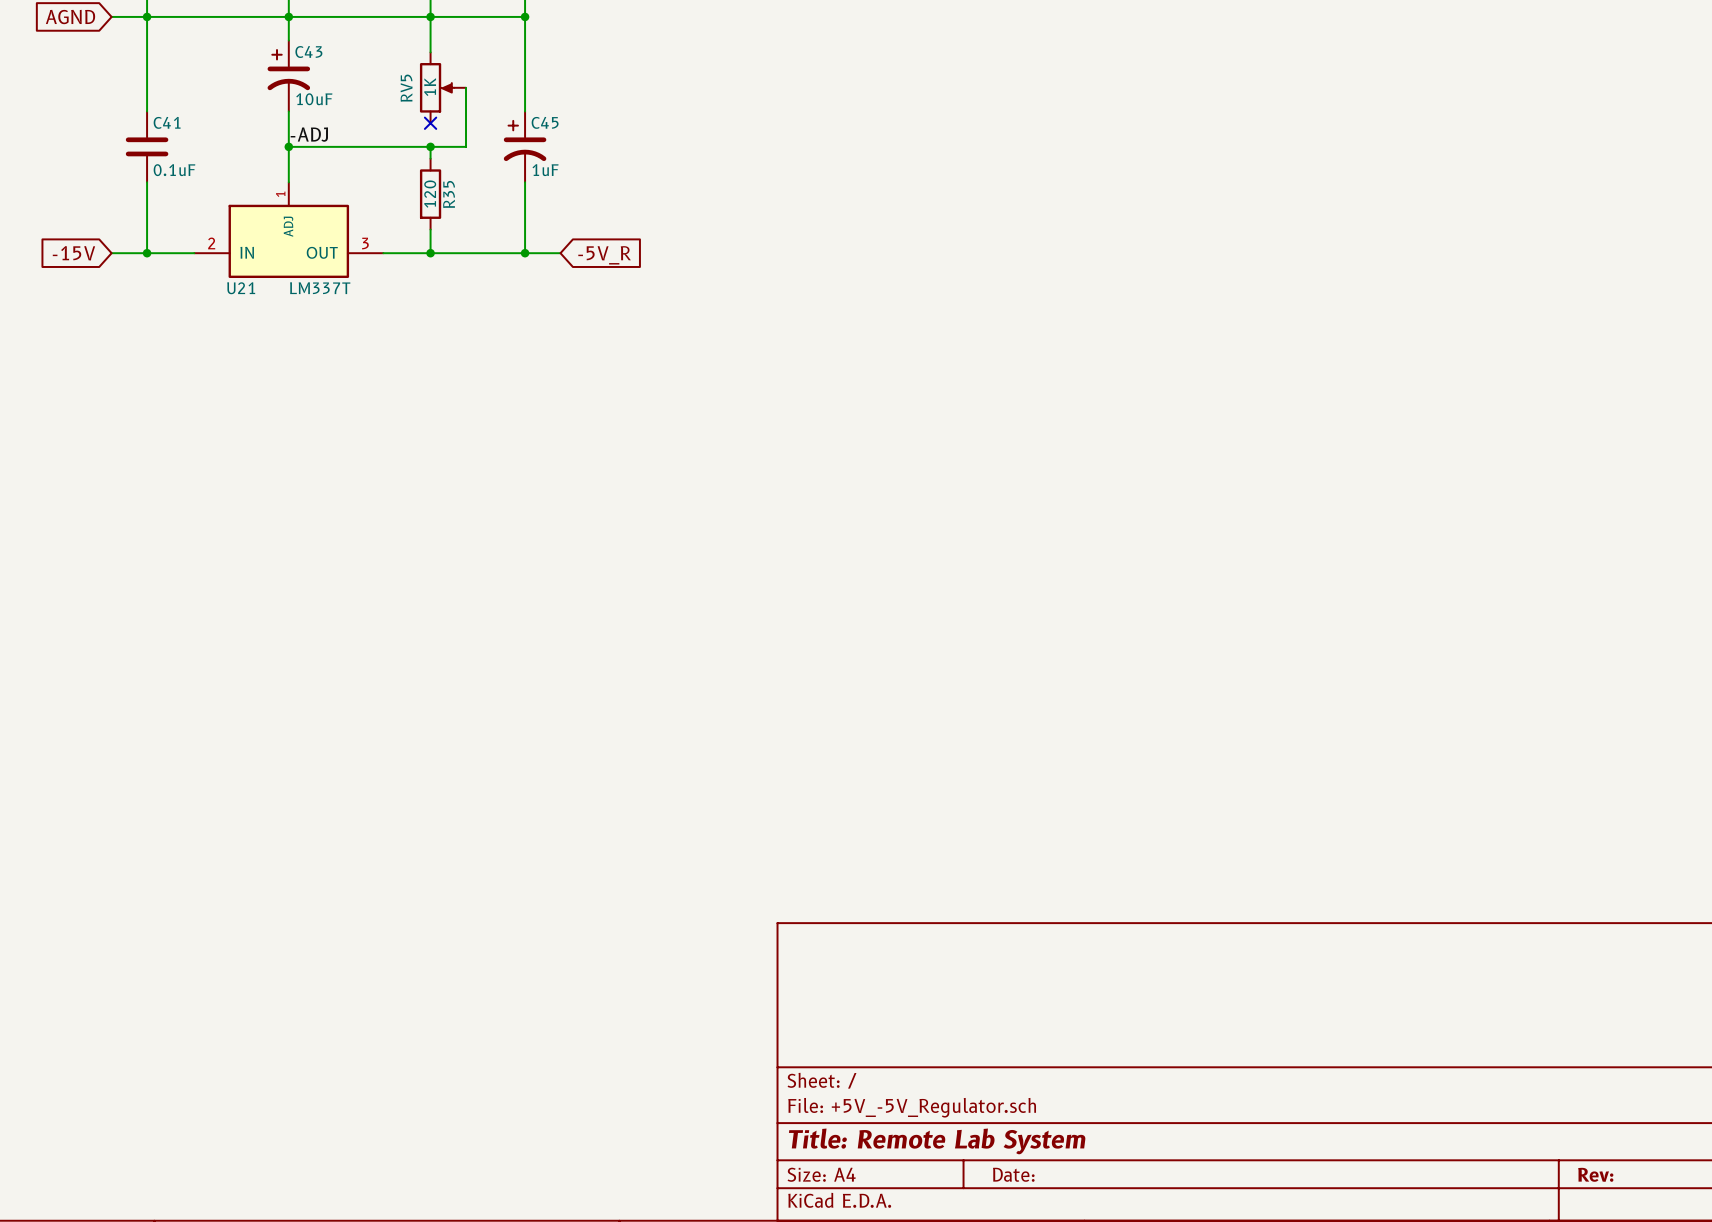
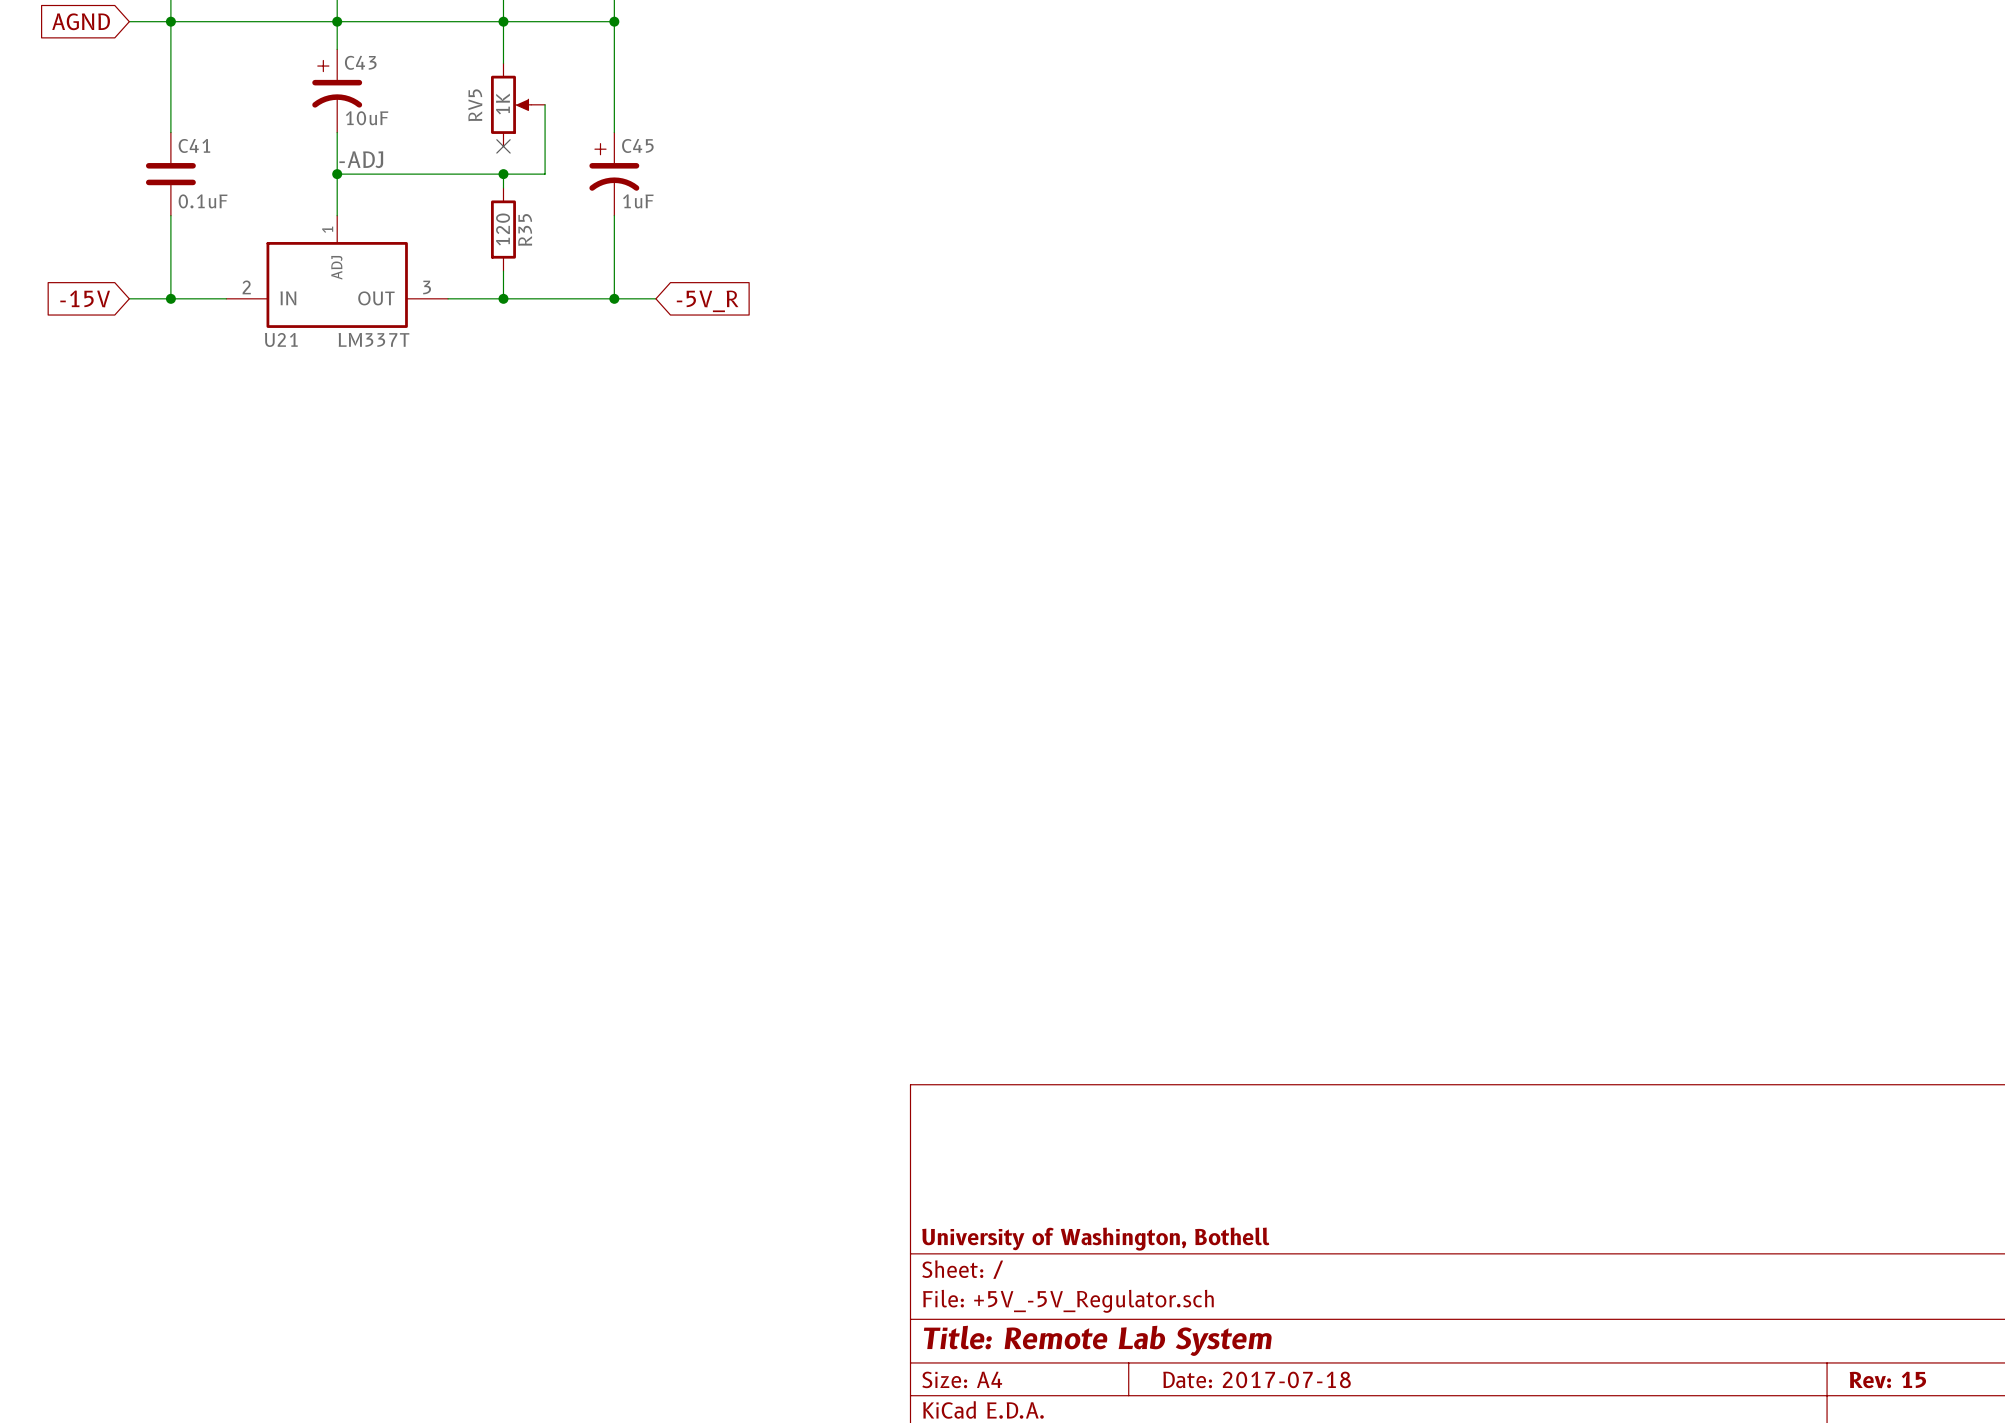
title block: none -> University of Washington, Bothell (1095, 1239)
title block: Date: (1013, 1174) -> Date: 2017-07-18 (1257, 1379)
title block: Rev: (1595, 1174) -> Rev: 15 (1887, 1379)

